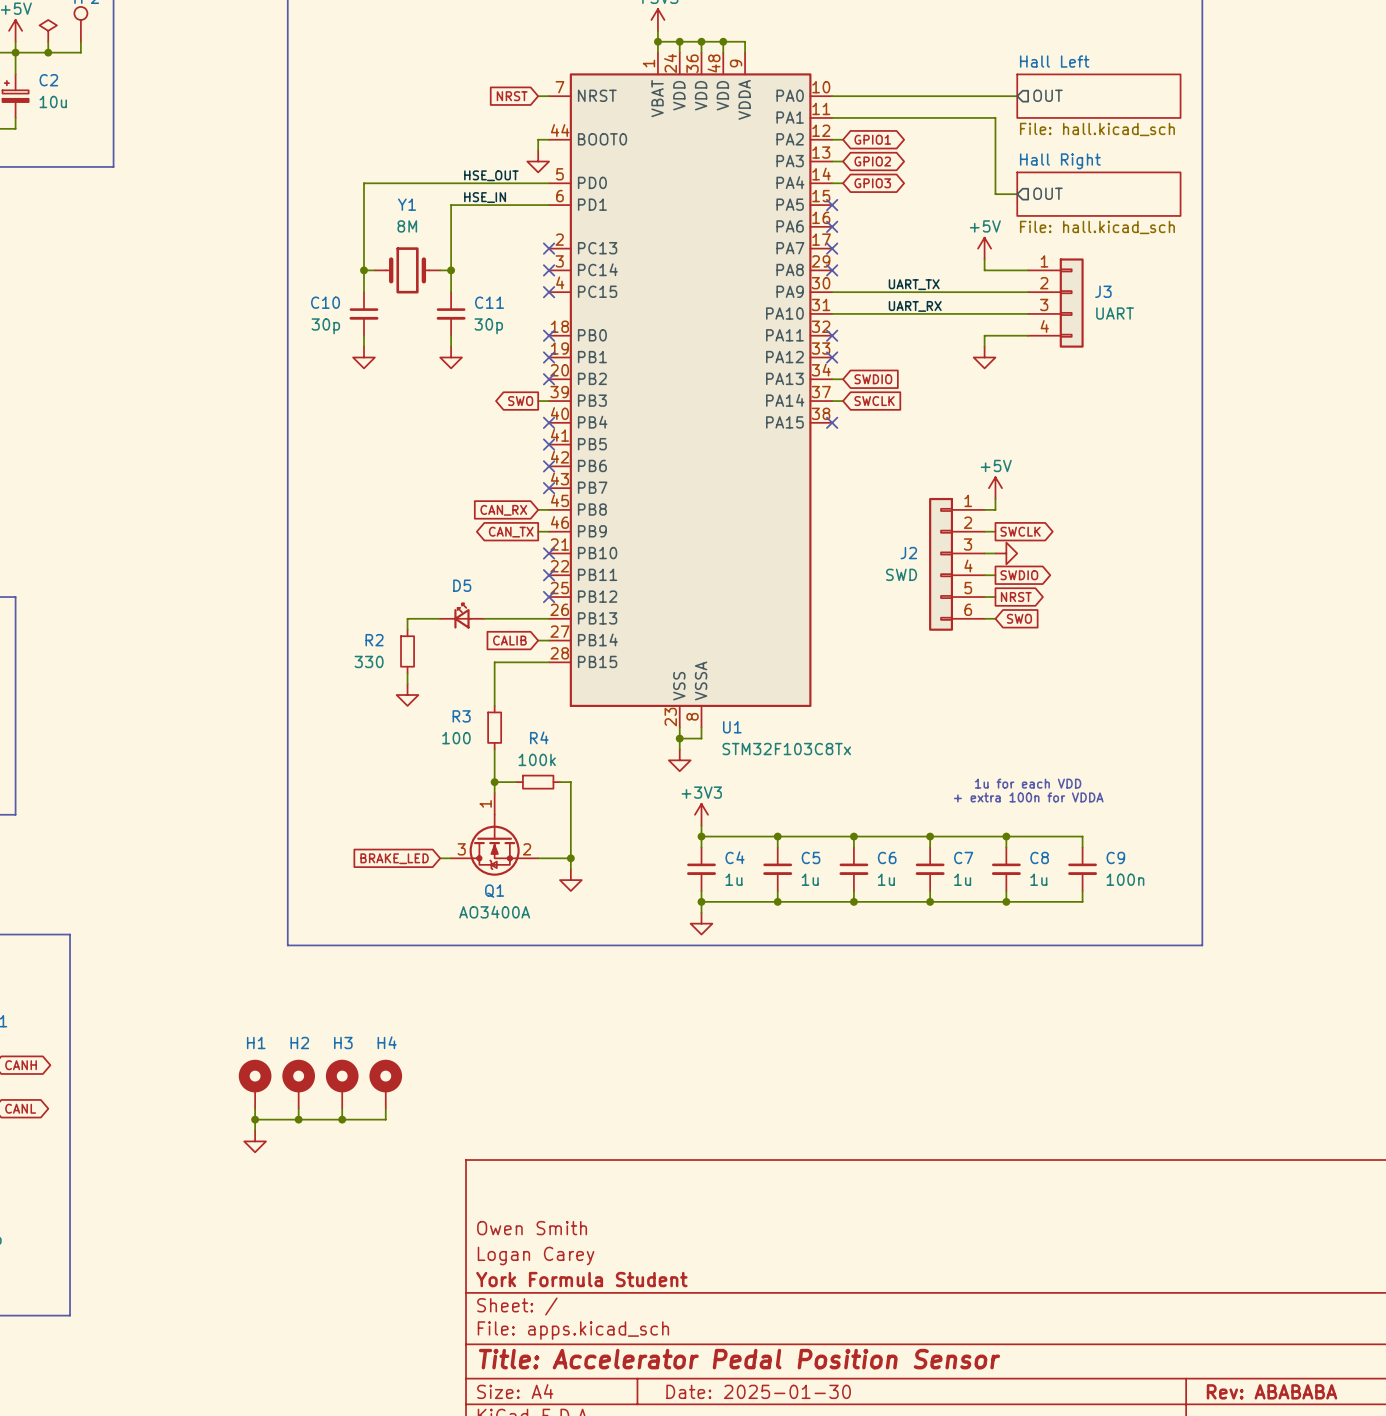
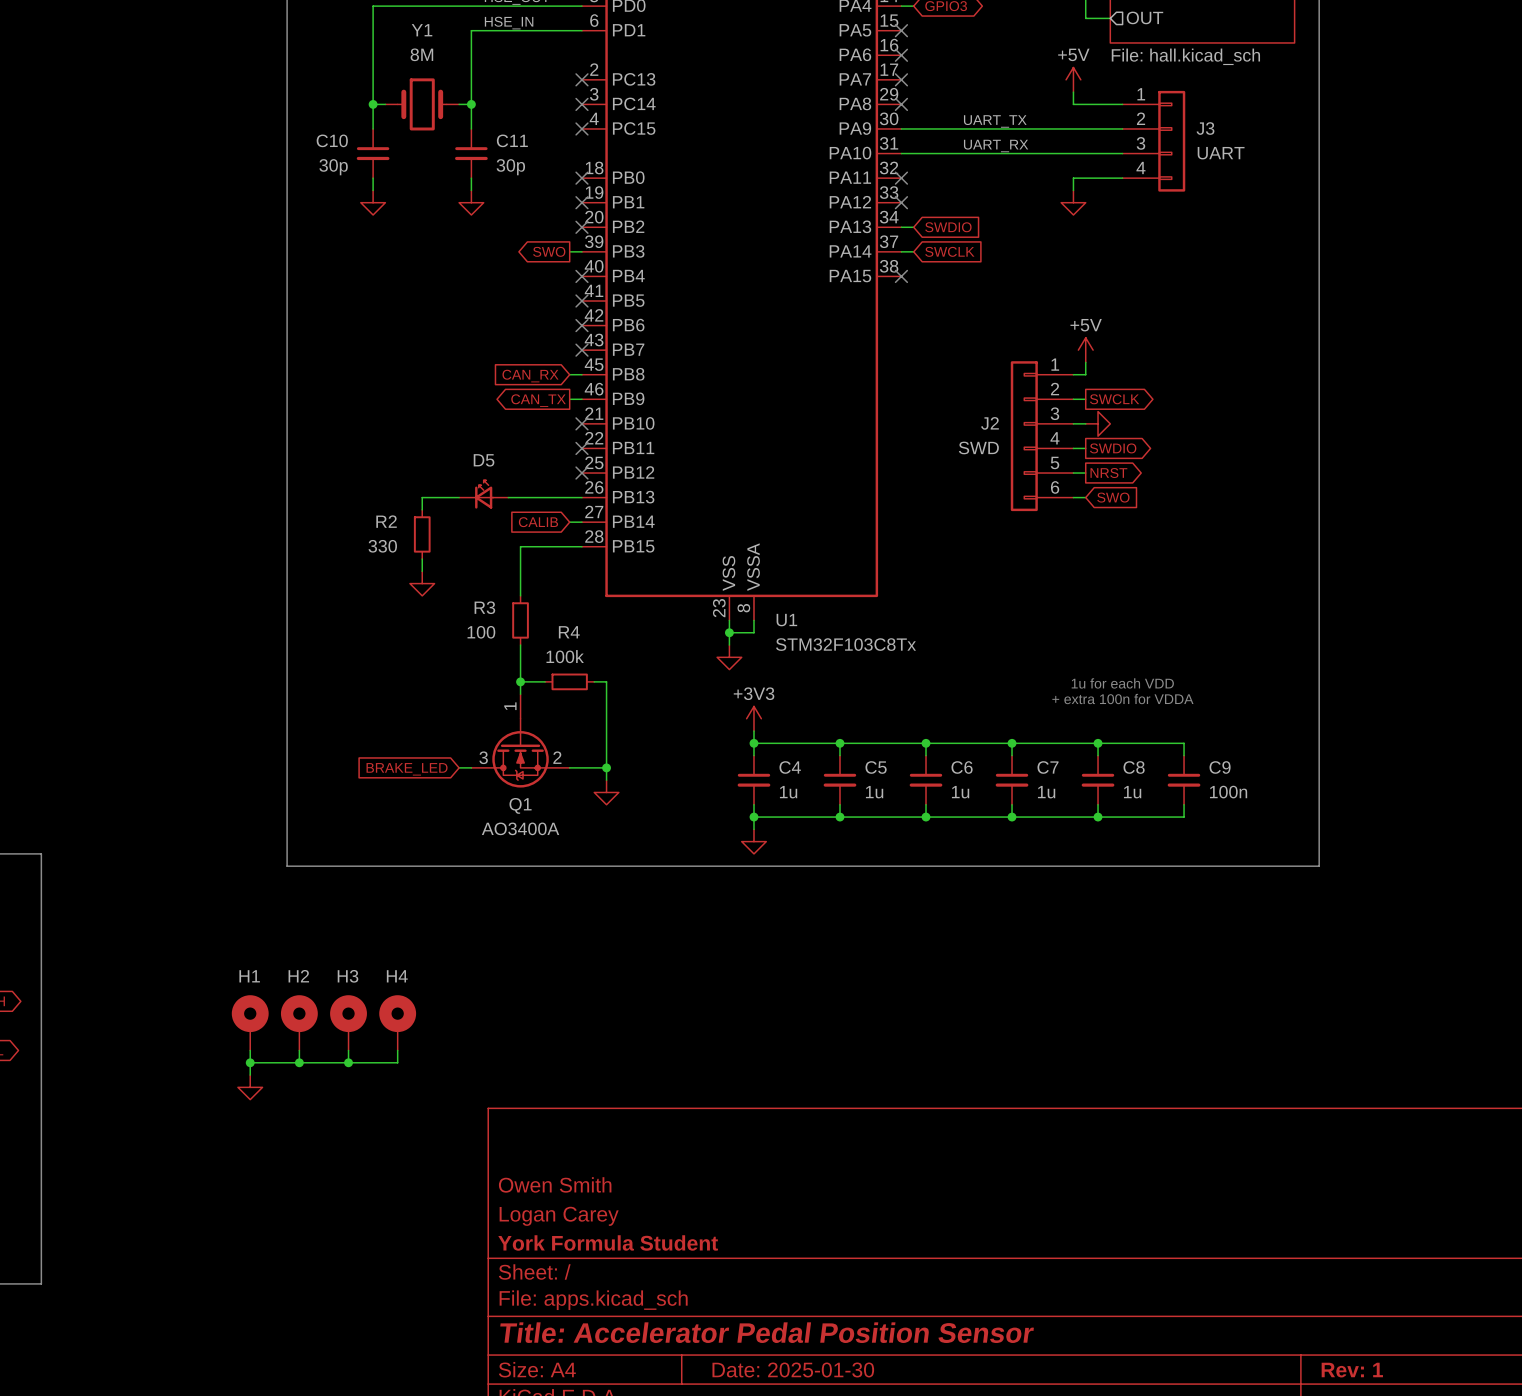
title block: Rev: ABABABA (1272, 1391) -> Rev: 1 (1352, 1370)

